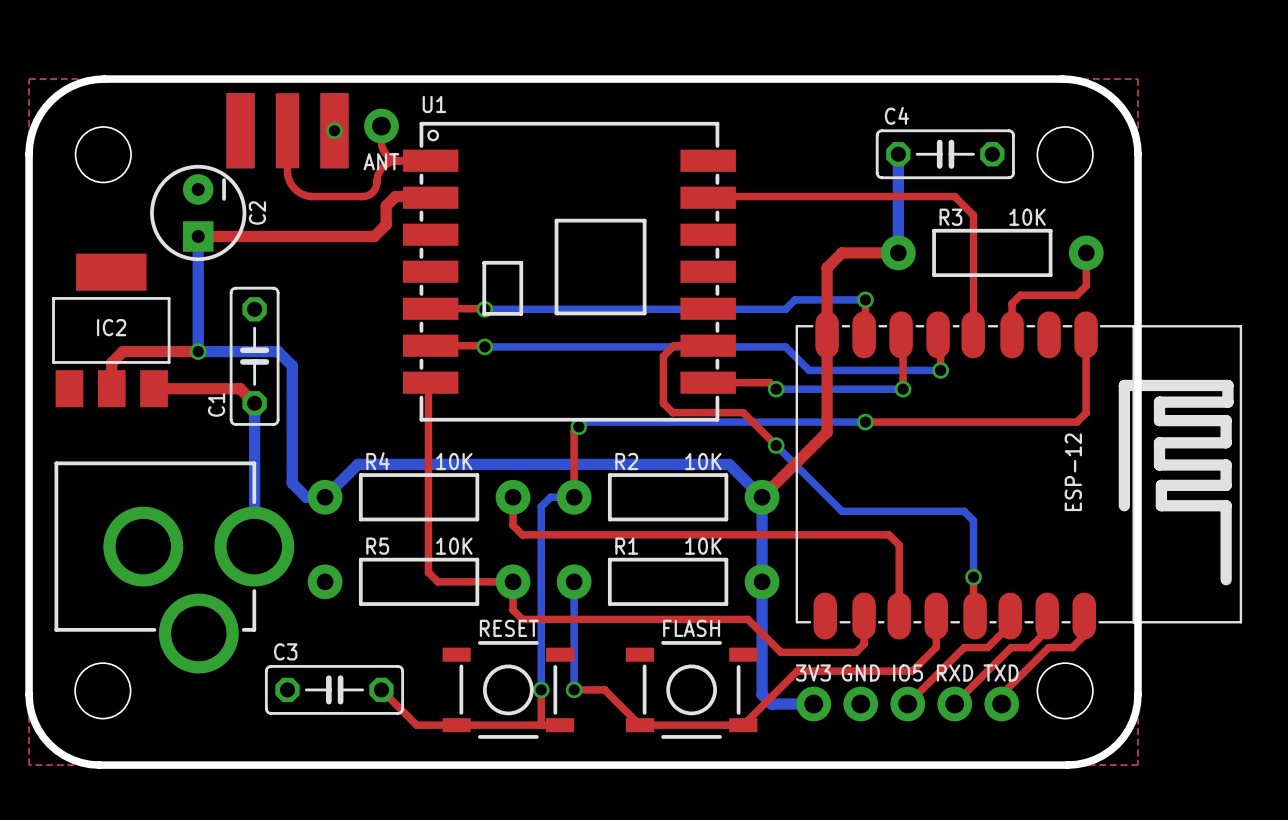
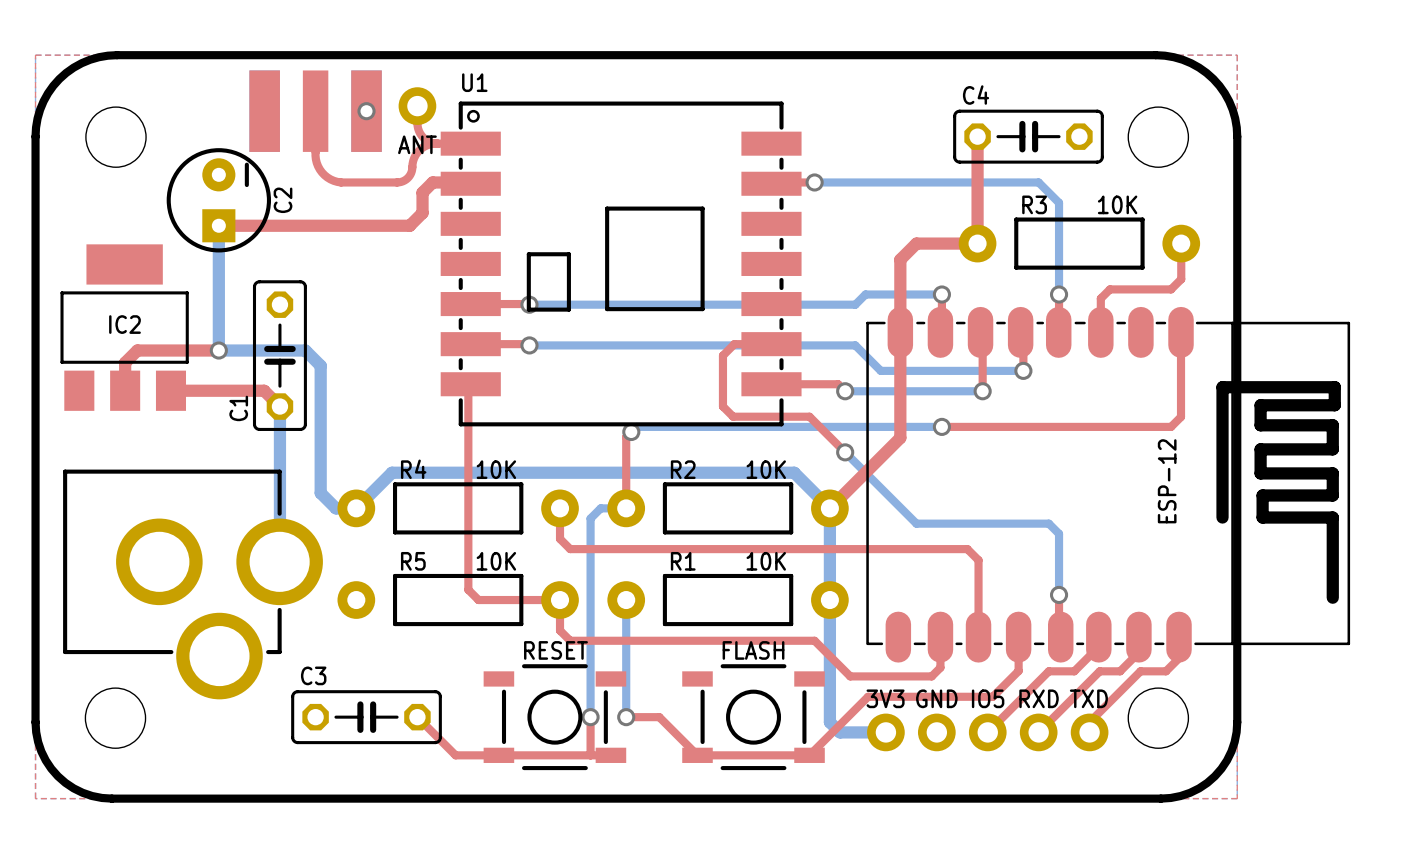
bottom track: (898, 154) (898, 252) -> none
top track: none -> (977, 136) (977, 243)
bottom track: none -> (814, 182) (1038, 182) (1059, 202) (1059, 294)
top track: (747, 196) (954, 196) (973, 215) (973, 299) -> none
via: none -> (814, 182)
via: none -> (1059, 294)

